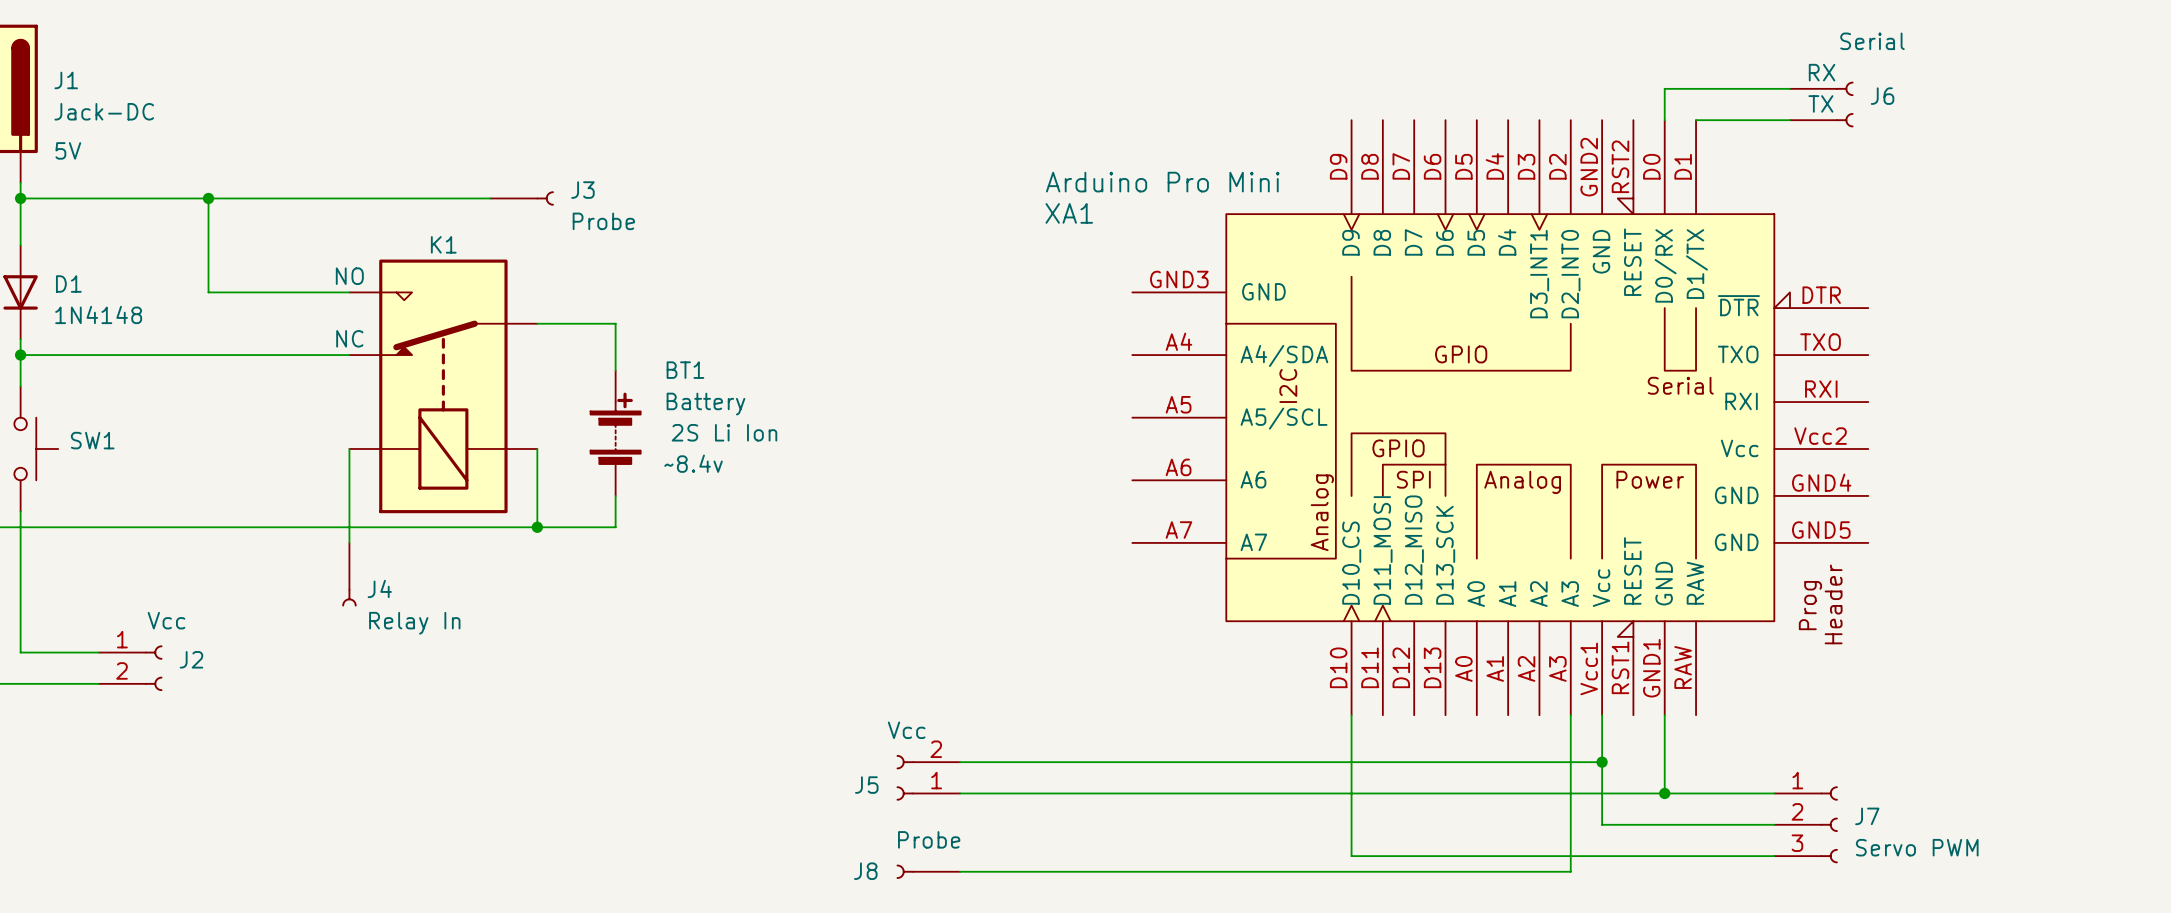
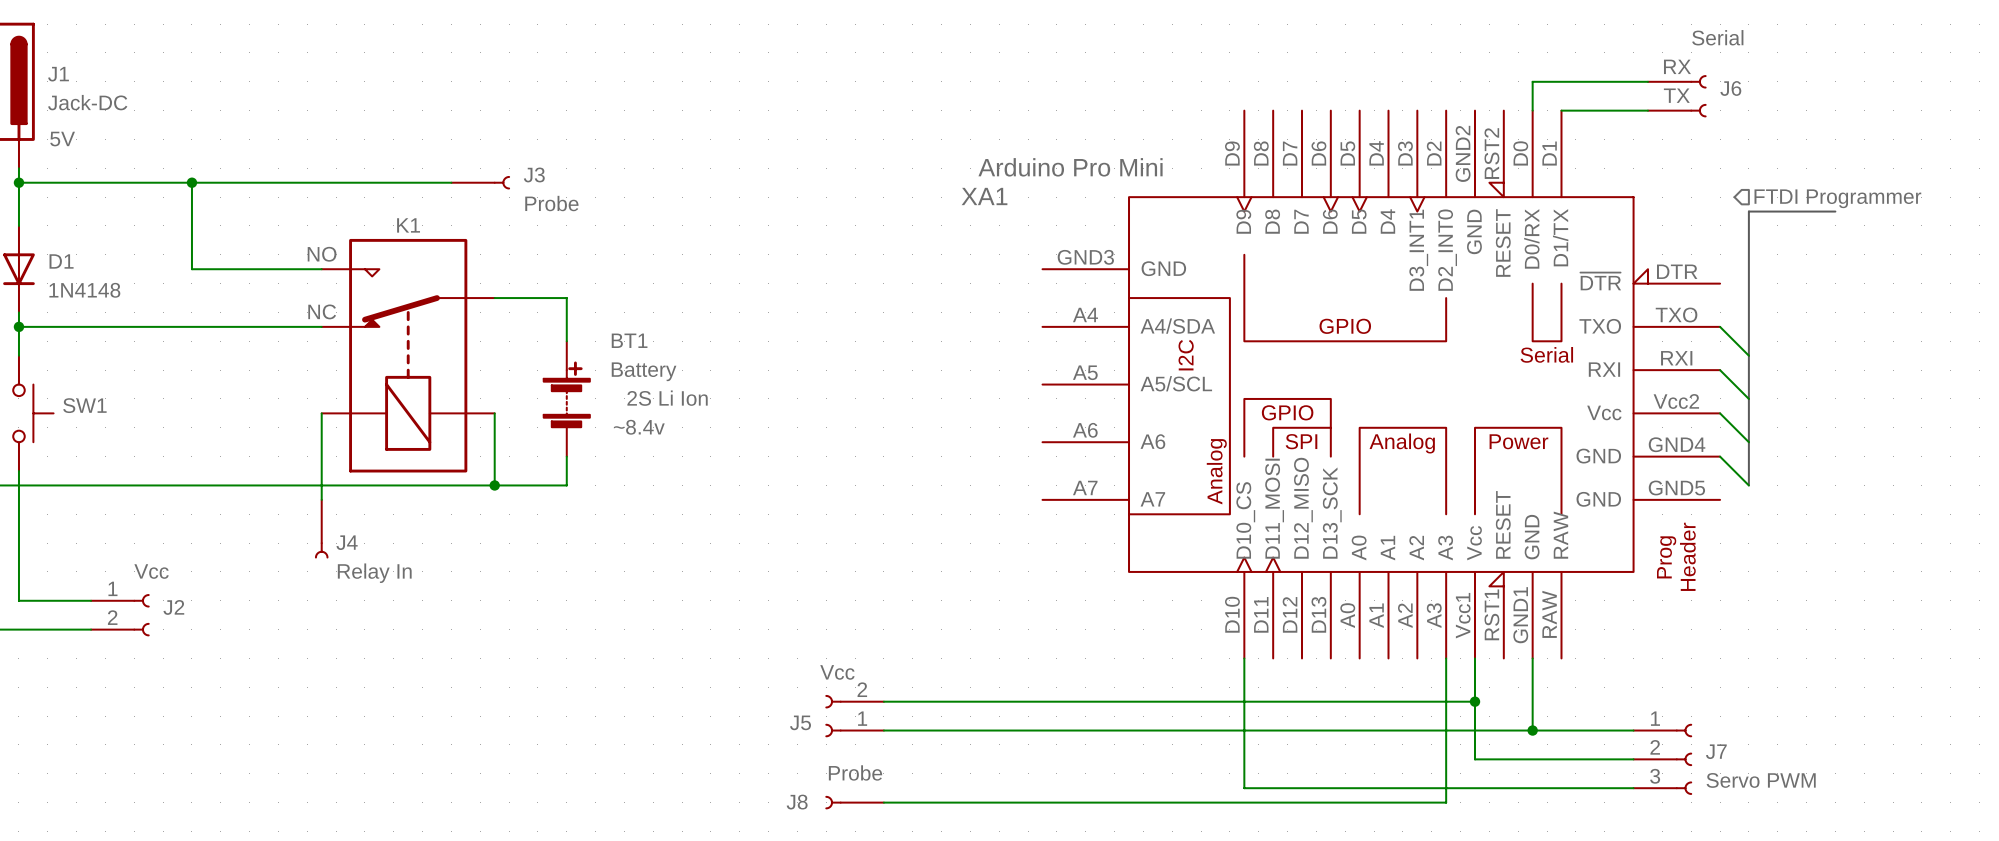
hierarchical label: none -> FTDI Programmer (1837, 198)
bus: none -> (1835, 211) (1748, 211) (1748, 485)
wire: none -> (1720, 326) (1748, 355)
wire: none -> (1720, 370) (1748, 398)
wire: none -> (1720, 413) (1748, 442)
wire: none -> (1720, 456) (1748, 485)

